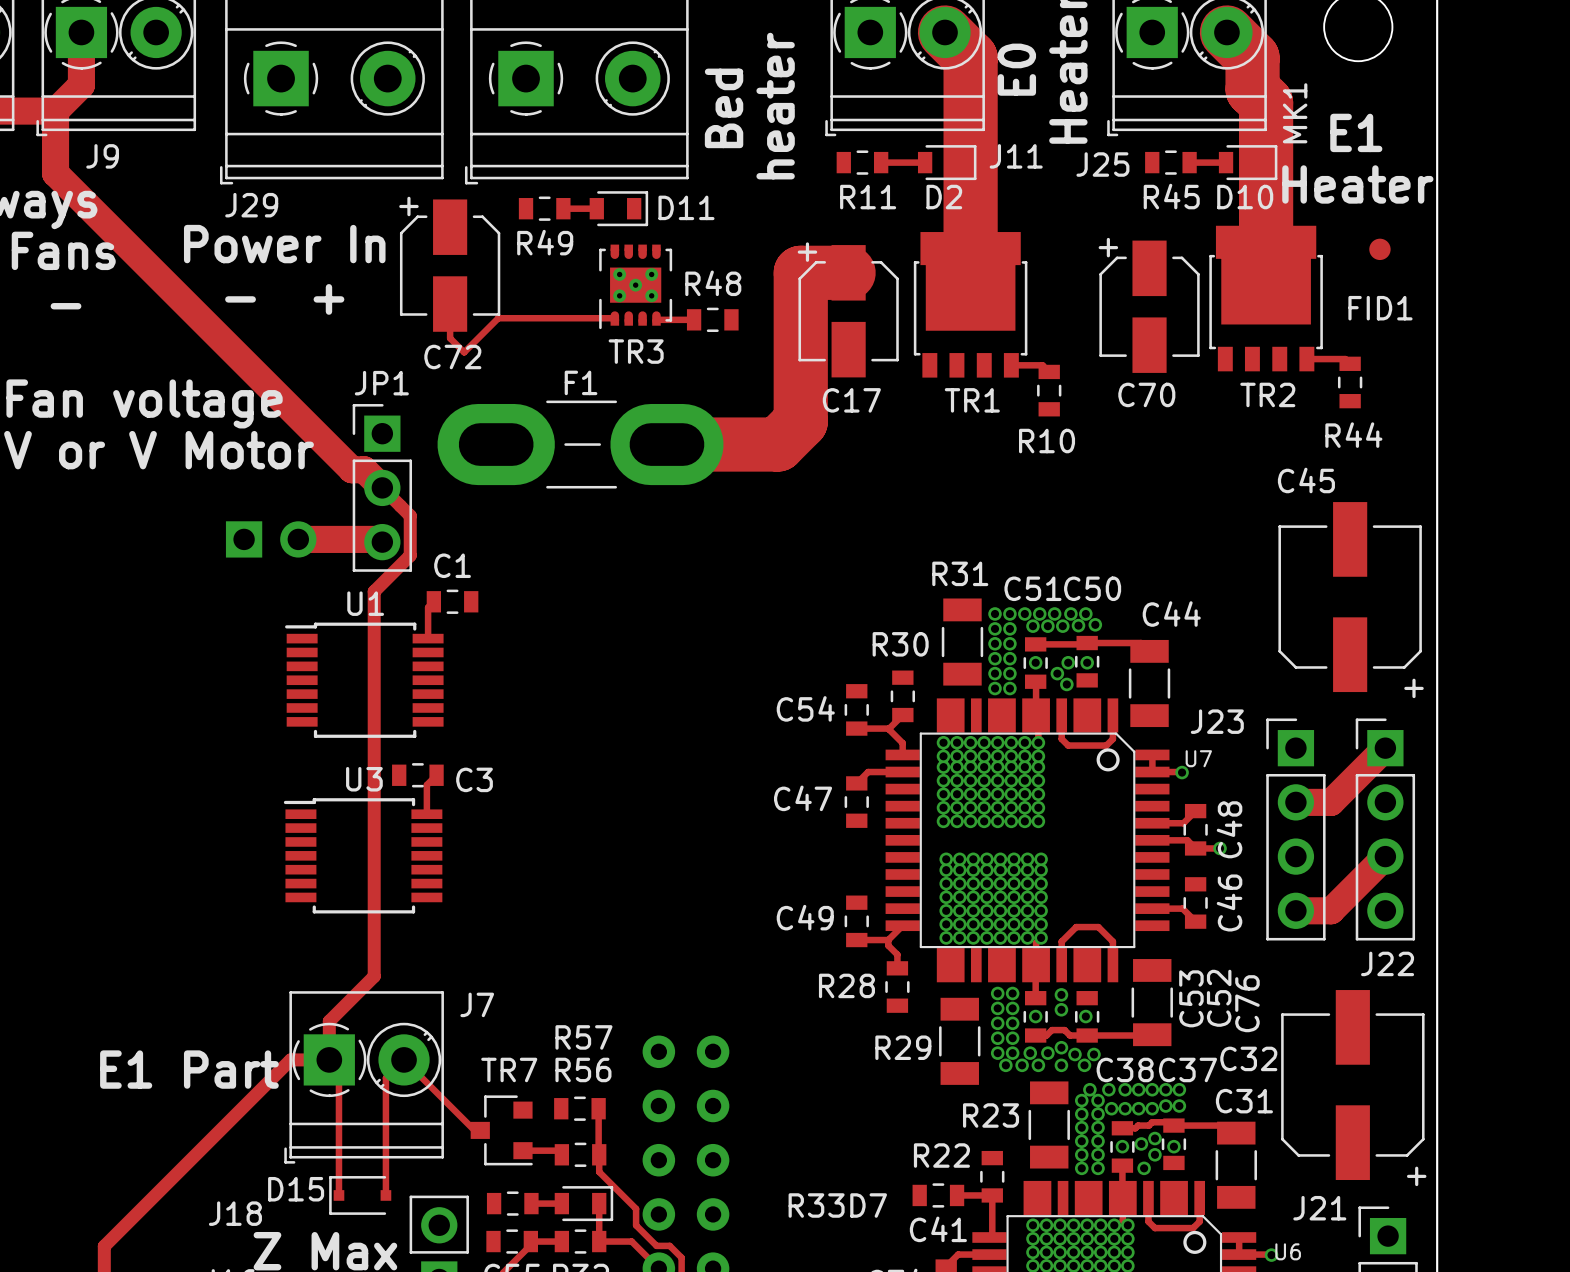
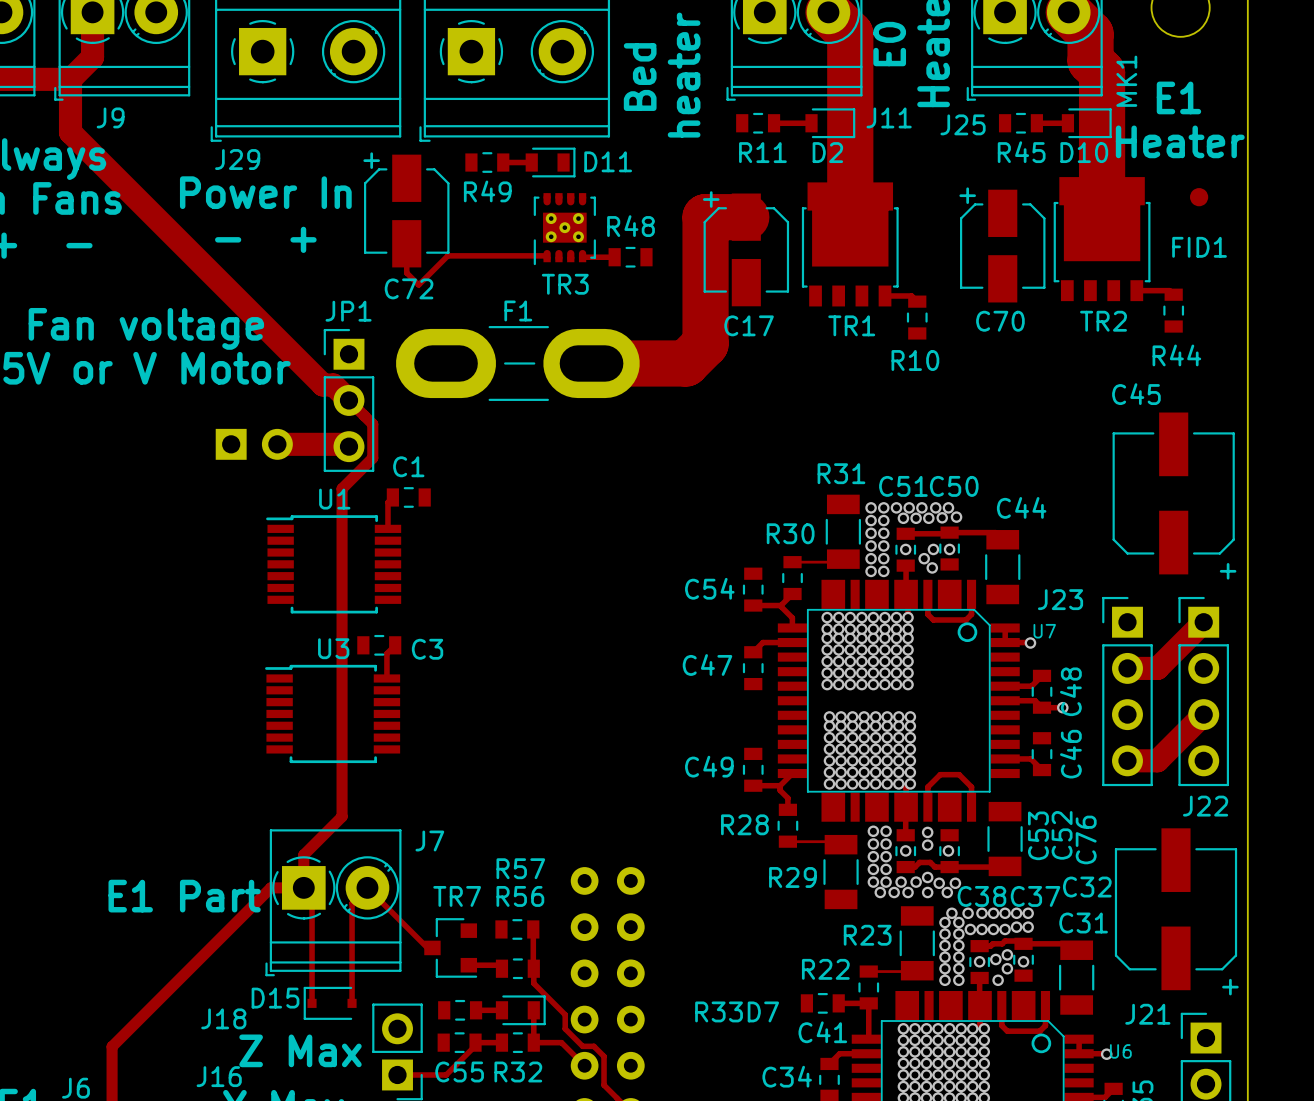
track: none -> (843, 559) (840, 562) (792, 562)
track: none -> (787, 841) (838, 841) (841, 844)
track: none -> (917, 970) (868, 971)

